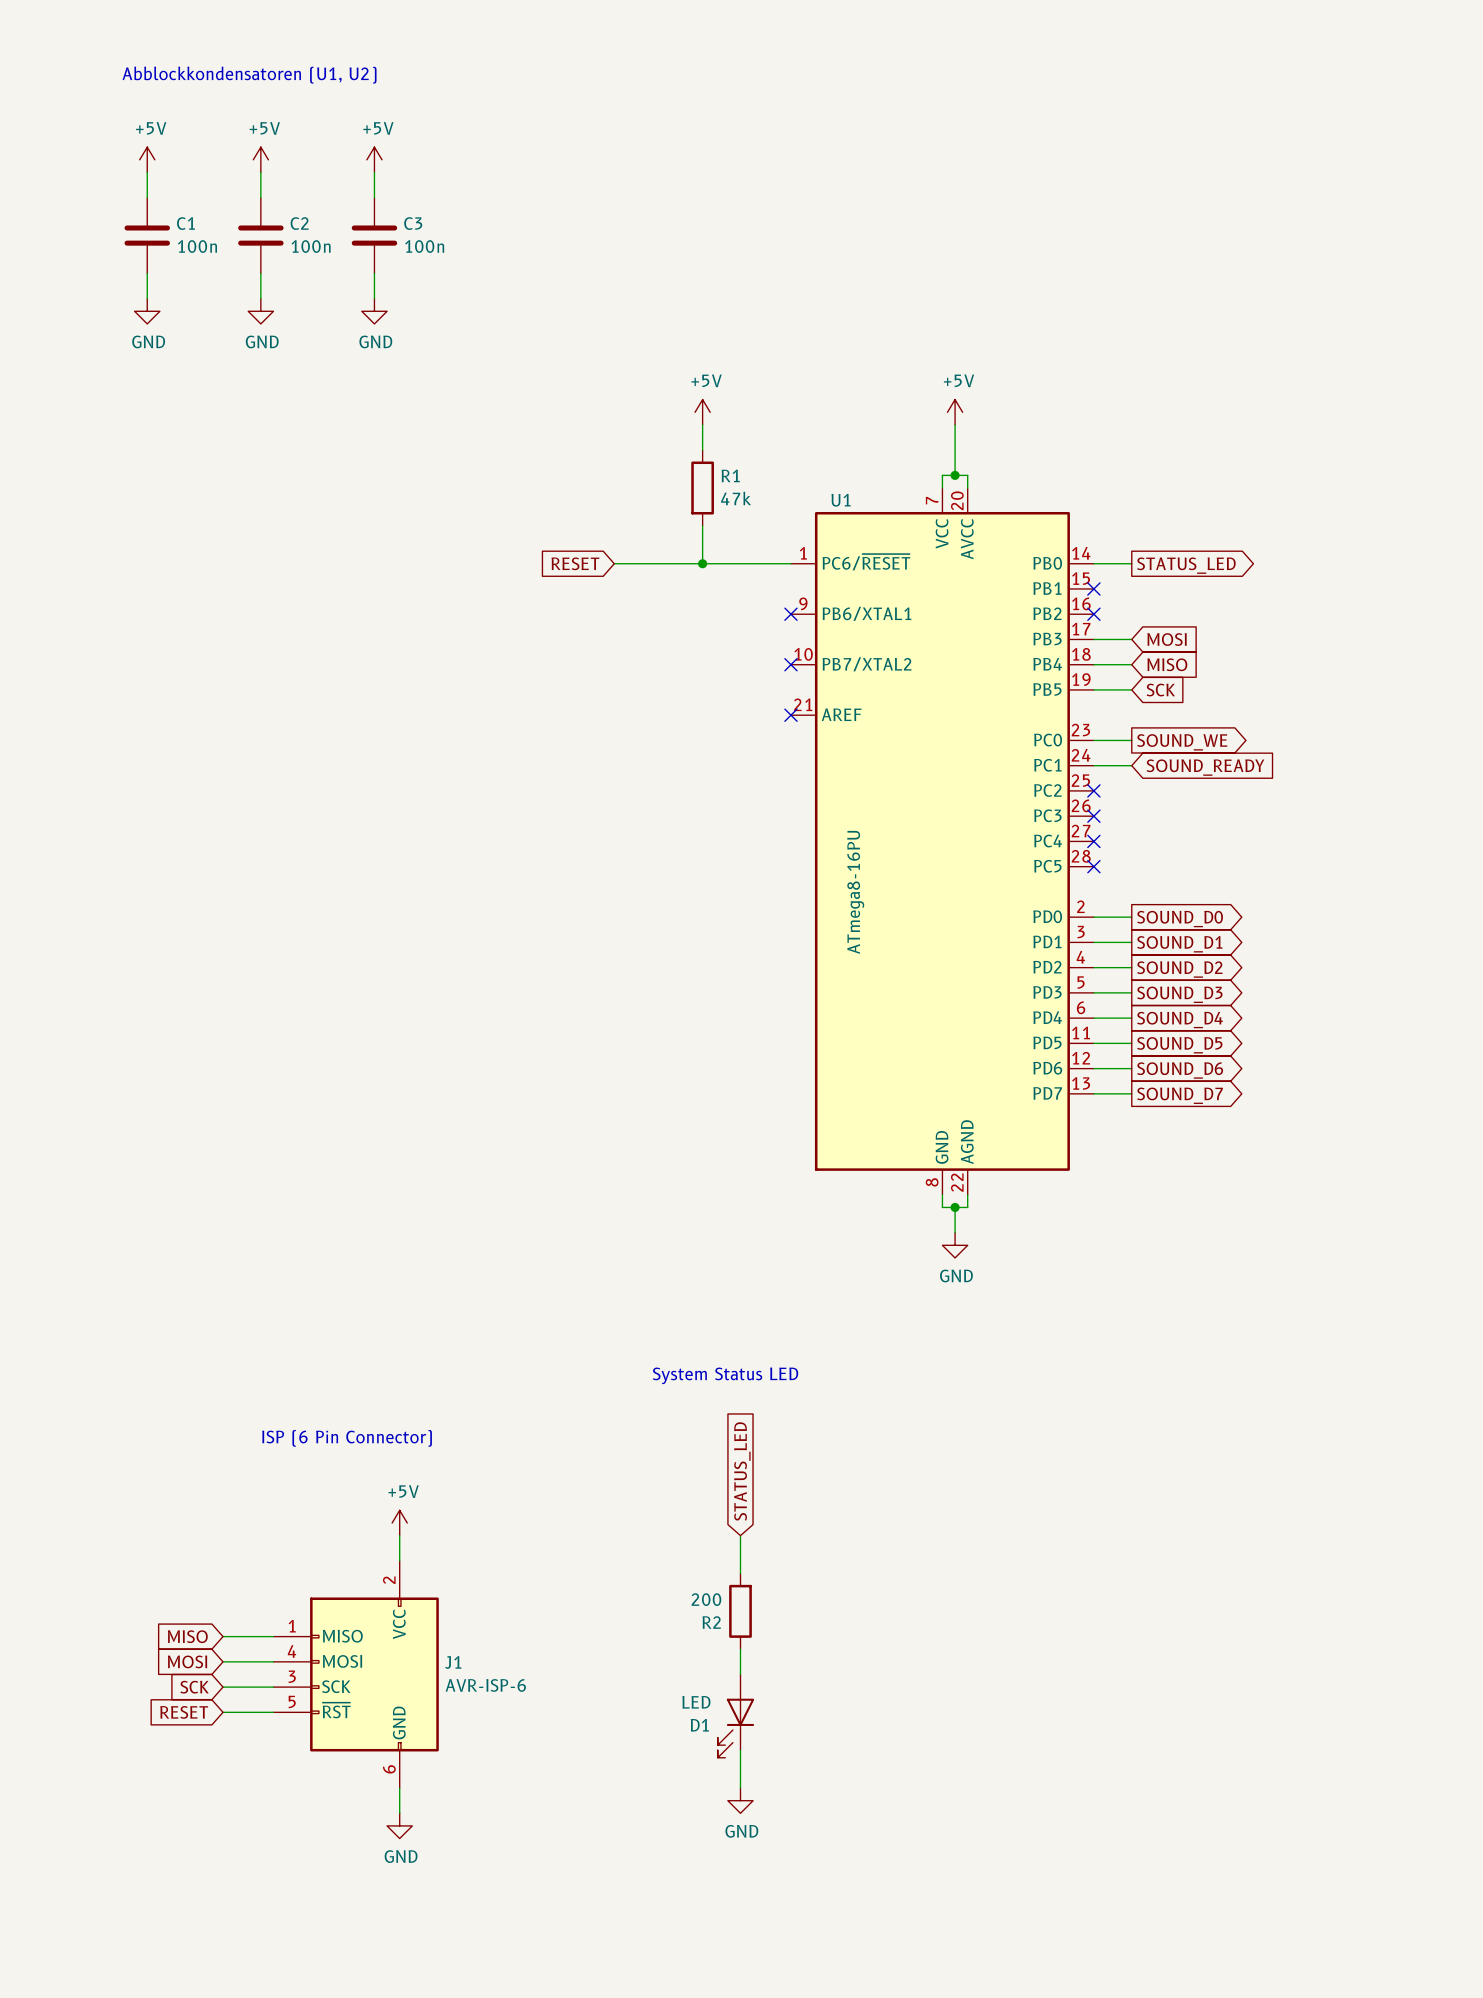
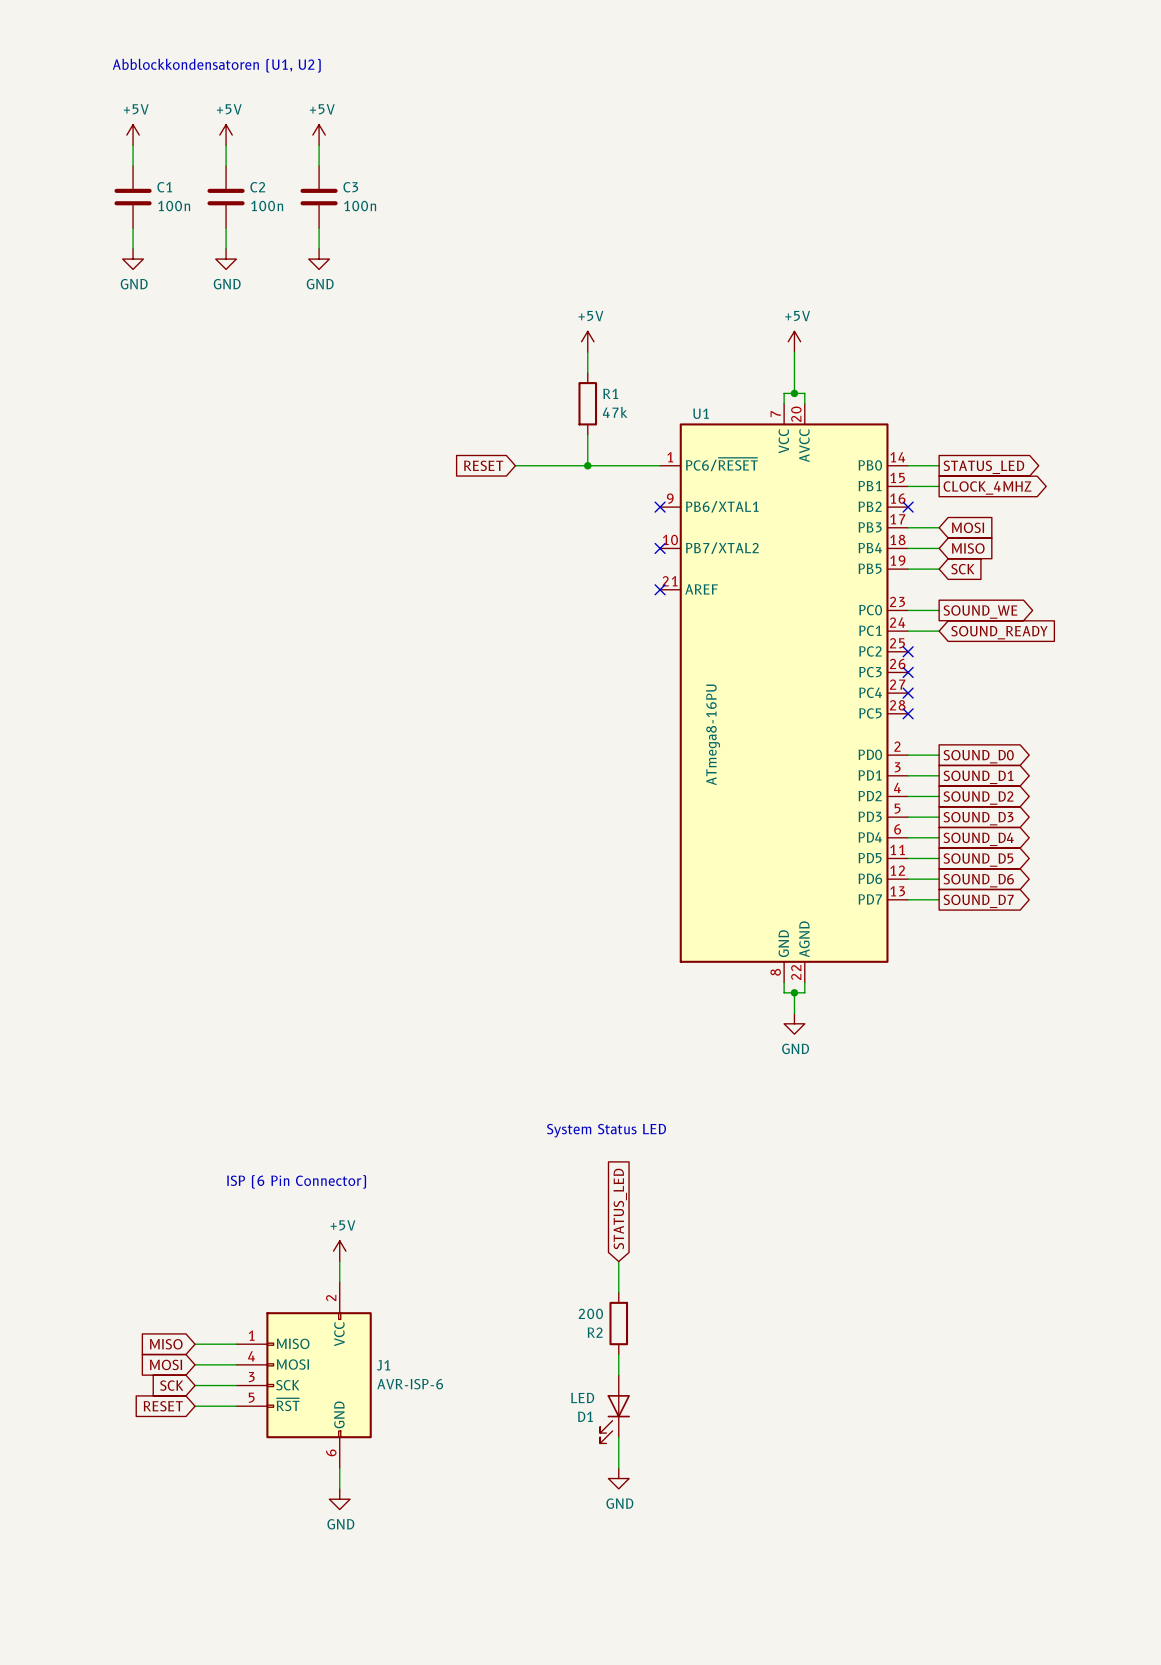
wire: none -> (908, 486) (939, 486)
no-connect mark: (1093, 588) -> none
global label: none -> CLOCK_4MHZ (987, 487)

